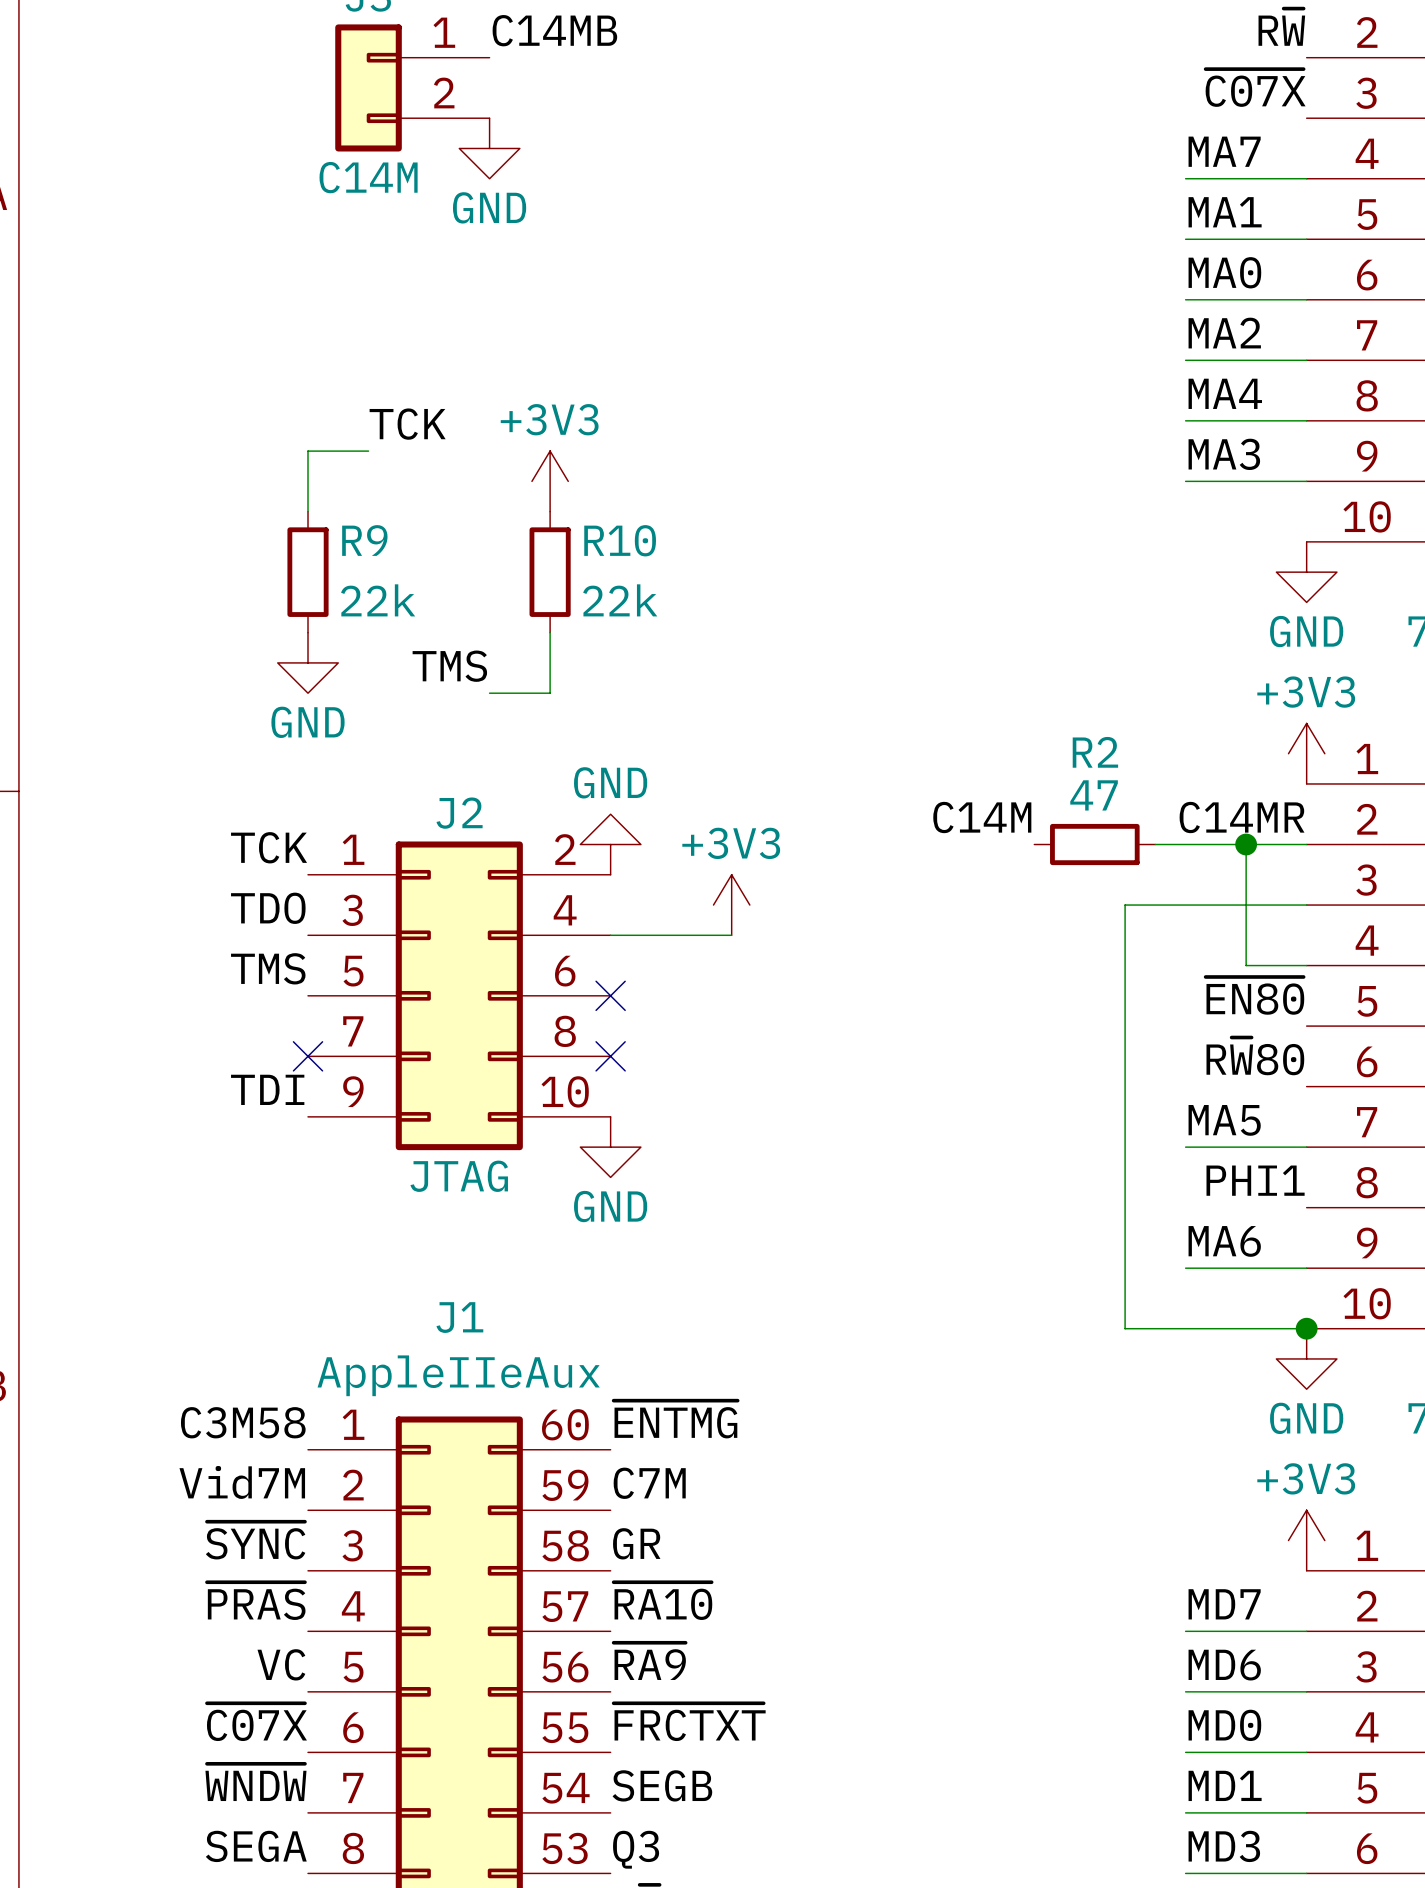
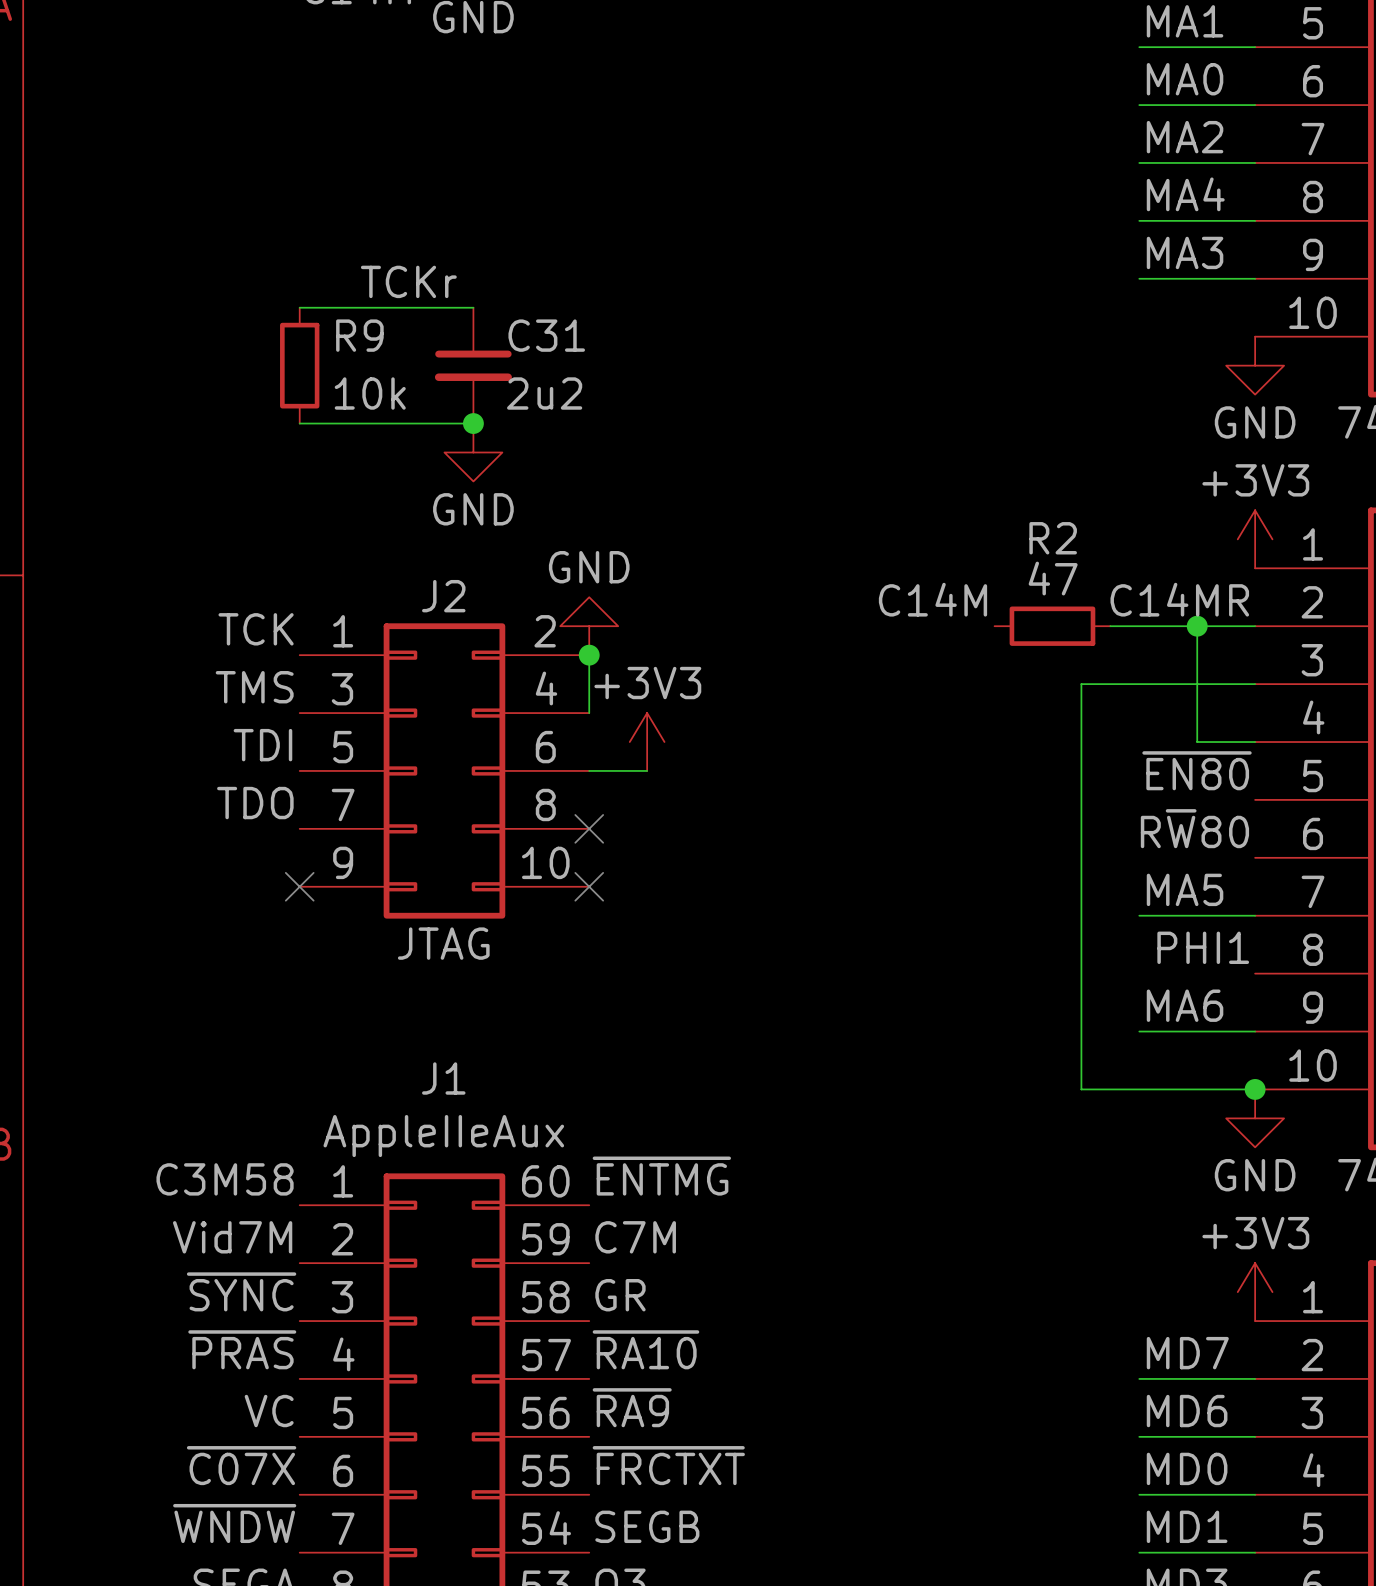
label: TCK (407, 424) -> TCKr (408, 281)
wire: (368, 451) (308, 451) (308, 511) -> (473, 307) (299, 307)
power symbol: +3V3 (550, 481) -> none
C31: none -> 2u2 (473, 365)
R10: 22k (550, 572) -> none
R9 value: 22k (378, 600) -> 10k (370, 393)
wire: none -> (299, 423) (473, 423)
junction: none -> (473, 423)
wire: (550, 632) (550, 693) (489, 693) -> none
power symbol position: GND (308, 662) -> GND (473, 452)
label: TMS (449, 666) -> none
junction: none -> (589, 655)
power symbol position: +3V3 (731, 905) -> +3V3 (647, 742)
label: TDO (268, 908) -> TMS (254, 687)
wire: (610, 935) (731, 935) -> (589, 713) (589, 655)
label: TMS (268, 968) -> TDI (262, 745)
wire: none -> (589, 770) (647, 770)
no-connect mark position: (610, 995) -> (589, 886)
no-connect mark position: (308, 1056) -> (299, 886)
label: TDI (267, 1089) -> TDO (255, 803)
power symbol: GND (610, 1147) -> none

